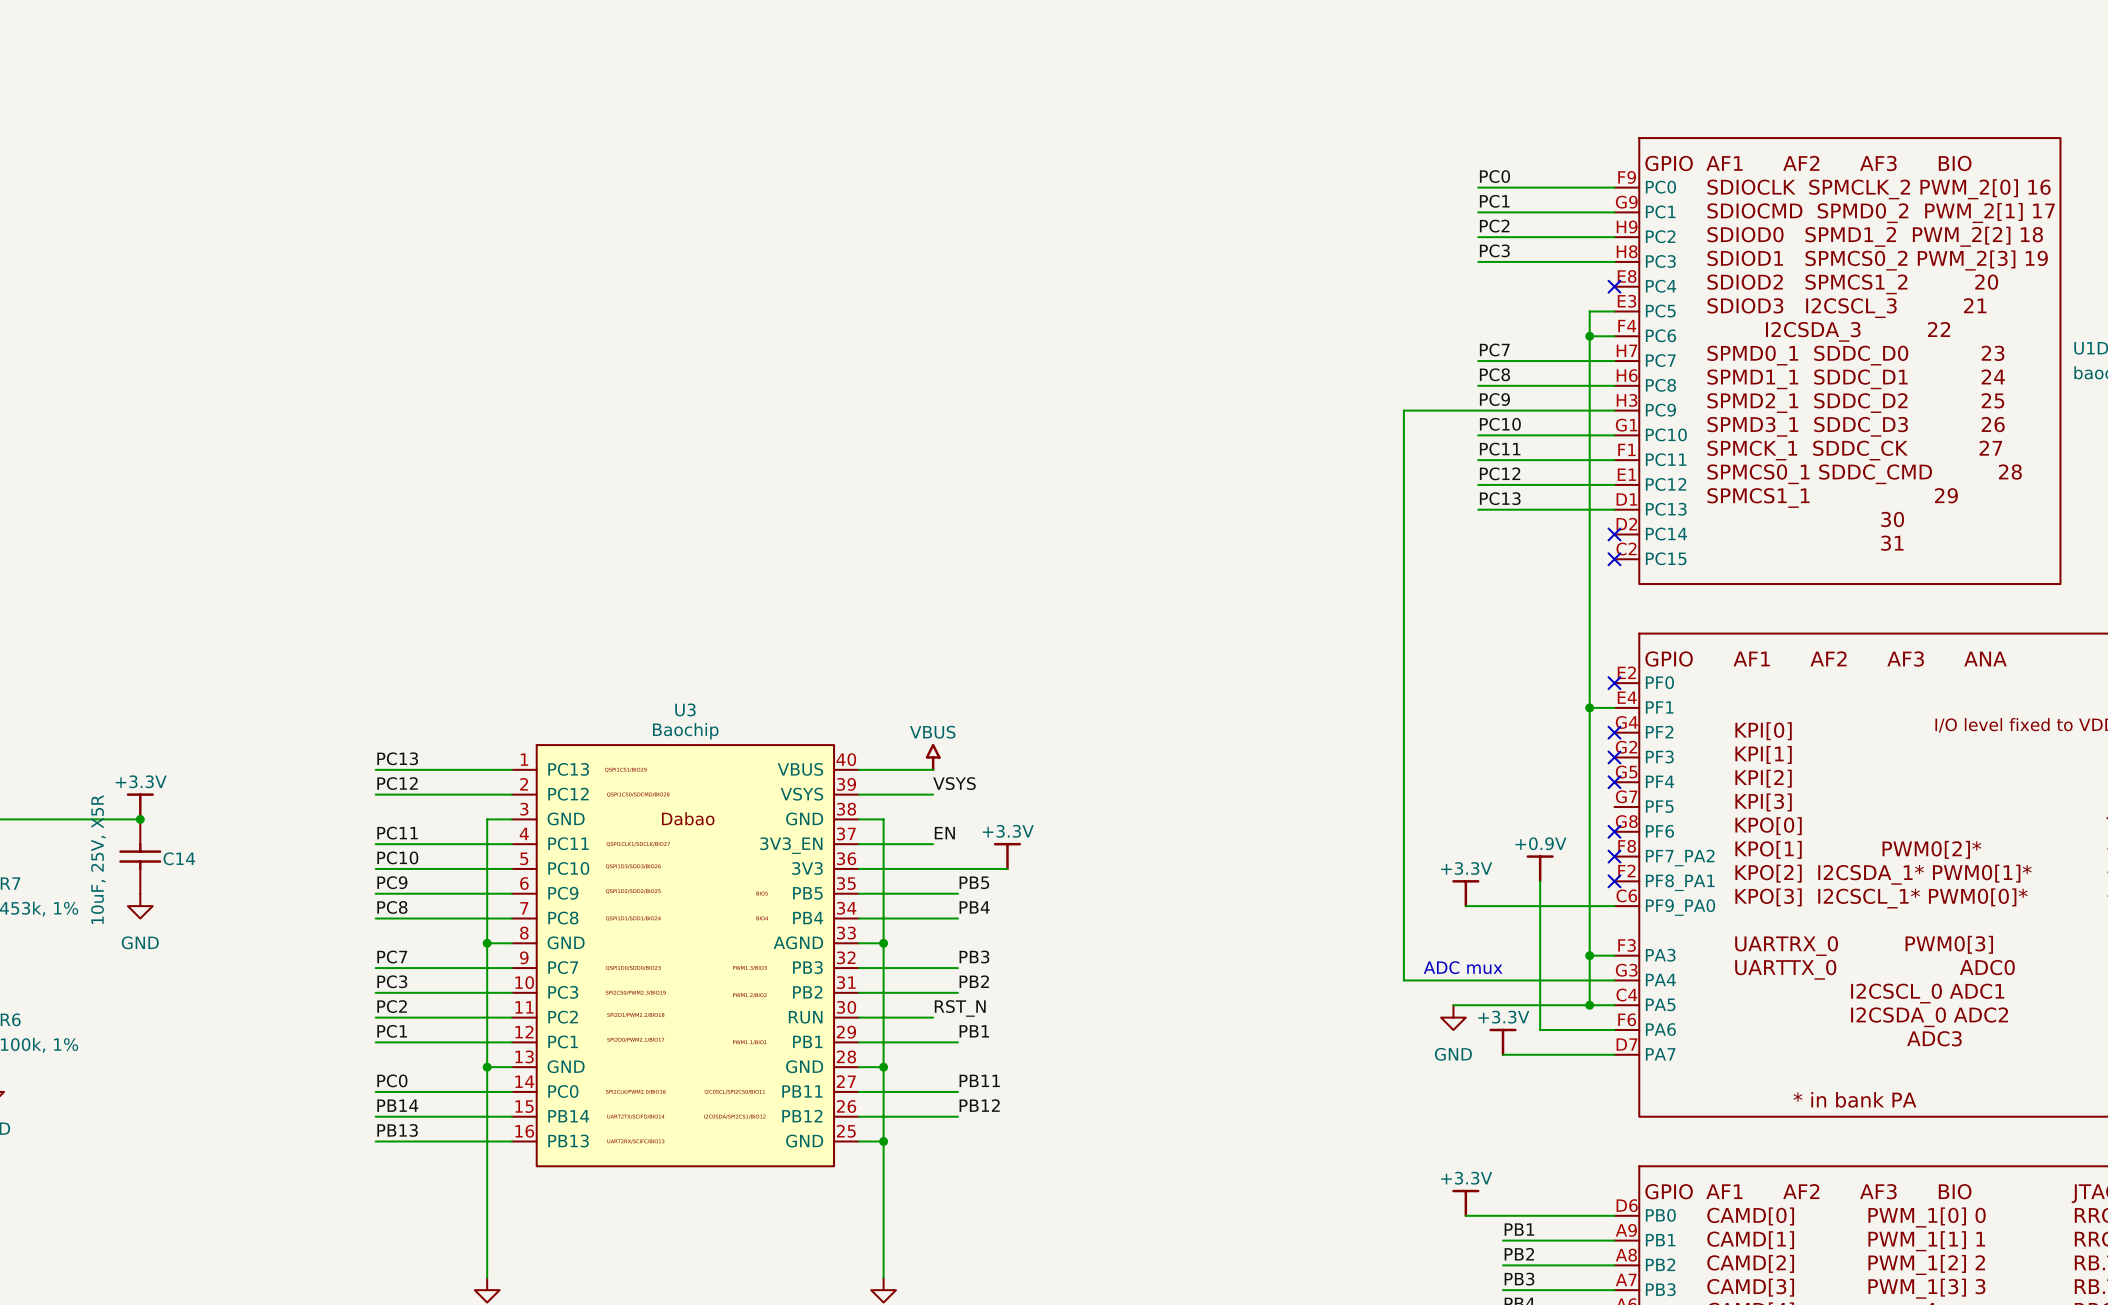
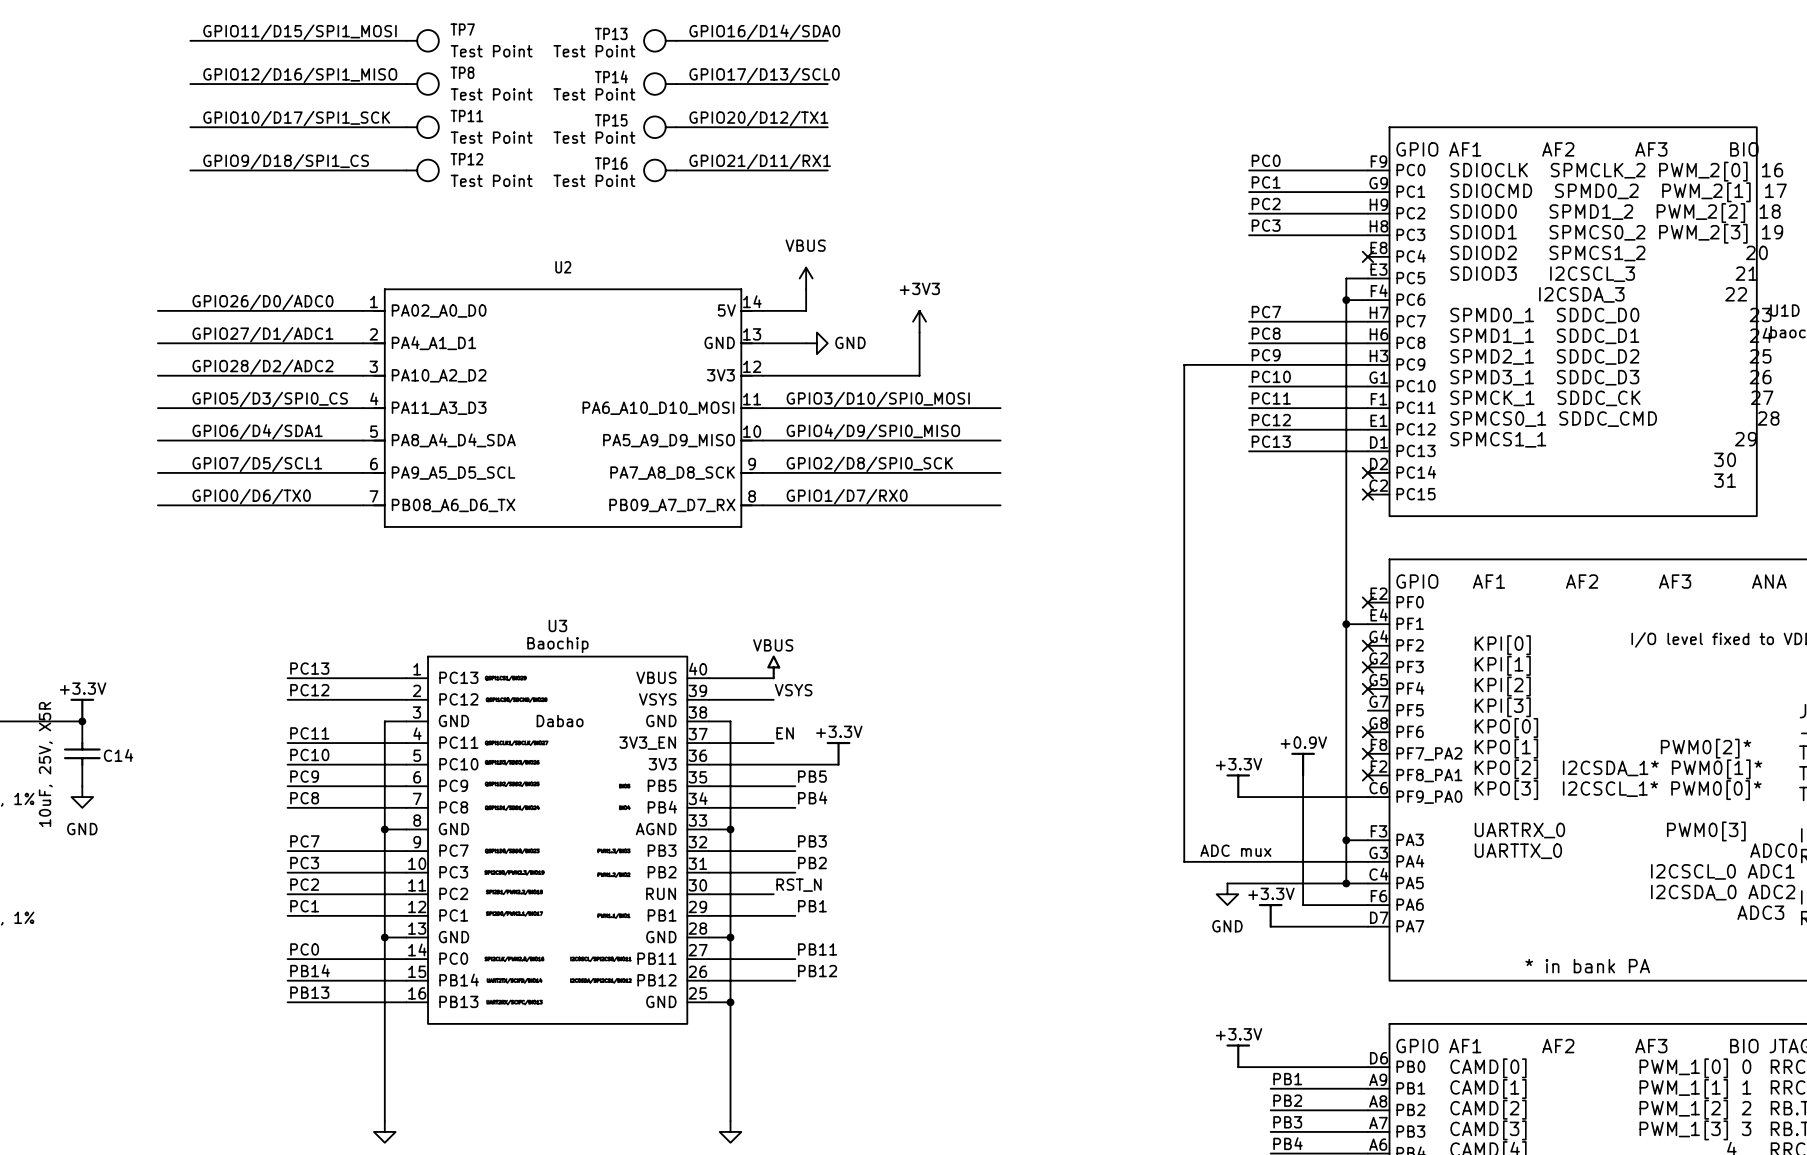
label: none -> GPIO16/D14/SDA0 (764, 32)
label: none -> GPIO11/D15/SPI1_MOSI (300, 32)
wire: none -> (190, 40) (406, 40)
TP7: none -> Test Point (422, 40)
TP13: none -> Test Point (660, 40)
wire: none -> (676, 40) (827, 40)
label: none -> GPIO17/D13/SCL0 (764, 75)
label: none -> GPIO12/D16/SPI1_MISO (300, 75)
wire: none -> (190, 84) (406, 84)
TP8: none -> Test Point (422, 84)
TP14: none -> Test Point (660, 84)
wire: none -> (676, 84) (827, 84)
label: none -> GPIO20/D12/TX1 (758, 118)
label: none -> GPIO10/D17/SPI1_SCK (296, 118)
wire: none -> (190, 127) (406, 127)
TP11: none -> Test Point (422, 127)
TP15: none -> Test Point (660, 127)
wire: none -> (676, 127) (827, 127)
label: none -> GPIO21/D11/RX1 (760, 161)
label: none -> GPIO9/D18/SPI1_CS (286, 161)
wire: none -> (190, 170) (406, 170)
TP12: none -> Test Point (422, 170)
TP16: none -> Test Point (660, 170)
wire: none -> (676, 170) (827, 170)
power symbol: none -> VBUS (806, 278)
wire: none -> (806, 289) (806, 310) (762, 310)
label: none -> GPIO26/D0/ADC0 (262, 302)
wire: none -> (157, 310) (363, 310)
power symbol: none -> +3V3 (919, 321)
wire: none -> (919, 332) (919, 375) (762, 375)
label: none -> GPIO27/D1/ADC1 (262, 334)
wire: none -> (157, 343) (363, 343)
wire: none -> (762, 343) (806, 343)
power symbol: none -> GND (816, 343)
label: none -> GPIO28/D2/ADC2 (262, 367)
wire: none -> (157, 375) (363, 375)
label: none -> GPIO5/D3/SPI0_CS (270, 399)
label: none -> GPIO3/D10/SPI0_MOSI (878, 399)
wire: none -> (157, 408) (363, 408)
U2: none -> (563, 408)
wire: none -> (762, 408) (1000, 408)
label: none -> GPIO6/D4/SDA1 (257, 431)
label: none -> GPIO4/D9/SPI0_MISO (873, 431)
wire: none -> (157, 440) (363, 440)
wire: none -> (762, 440) (1000, 440)
label: none -> GPIO7/D5/SCL1 (257, 464)
label: none -> GPIO2/D8/SPI0_SCK (869, 464)
wire: none -> (157, 472) (363, 472)
wire: none -> (762, 472) (1000, 472)
label: none -> GPIO0/D6/TX0 (251, 496)
label: none -> GPIO1/D7/RX0 (847, 496)
wire: none -> (157, 505) (363, 505)
wire: none -> (762, 505) (1000, 505)

